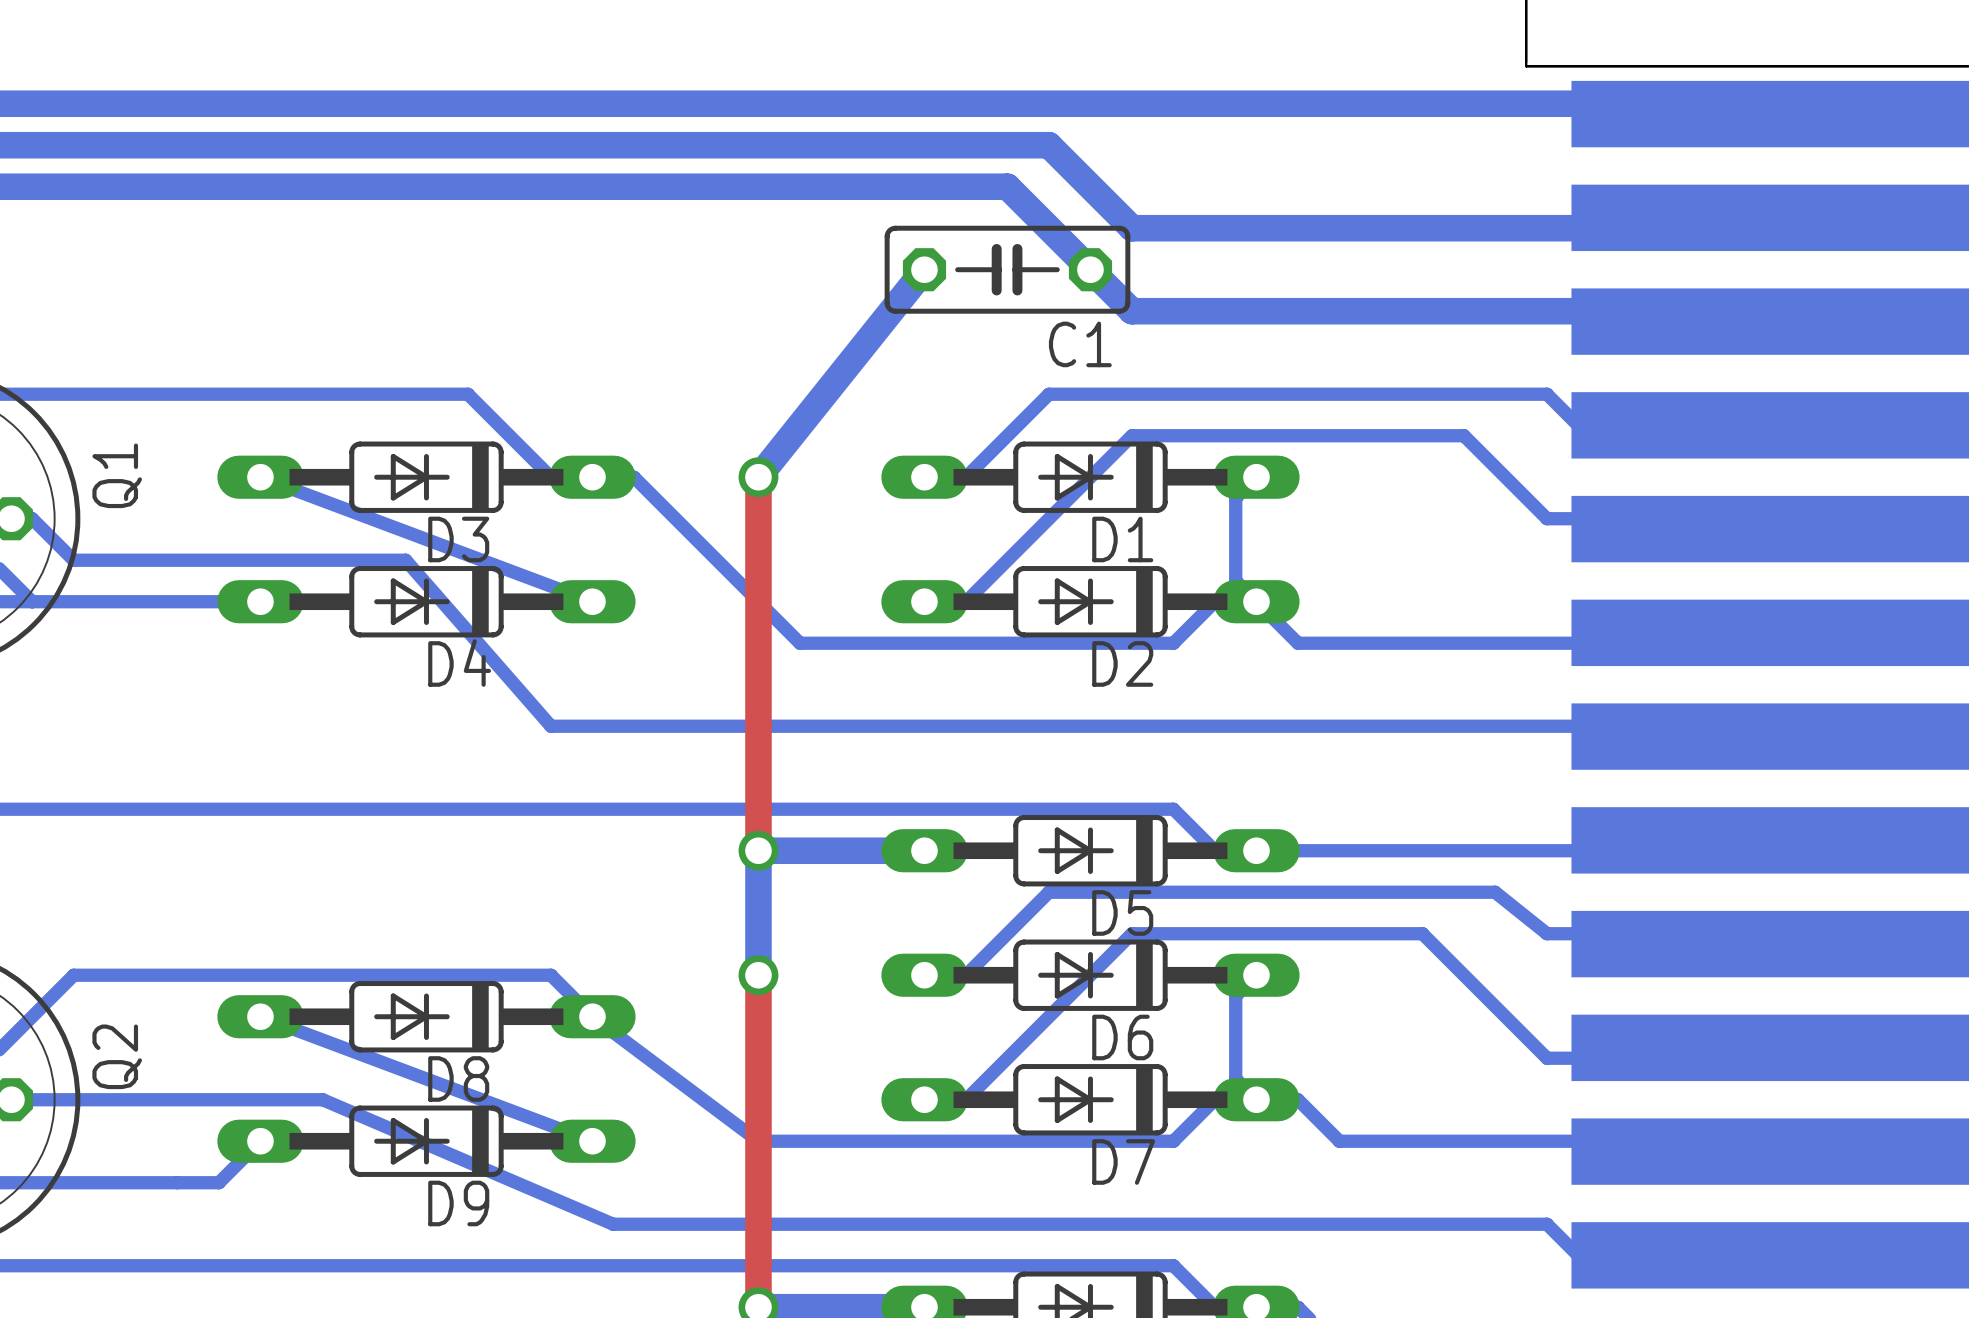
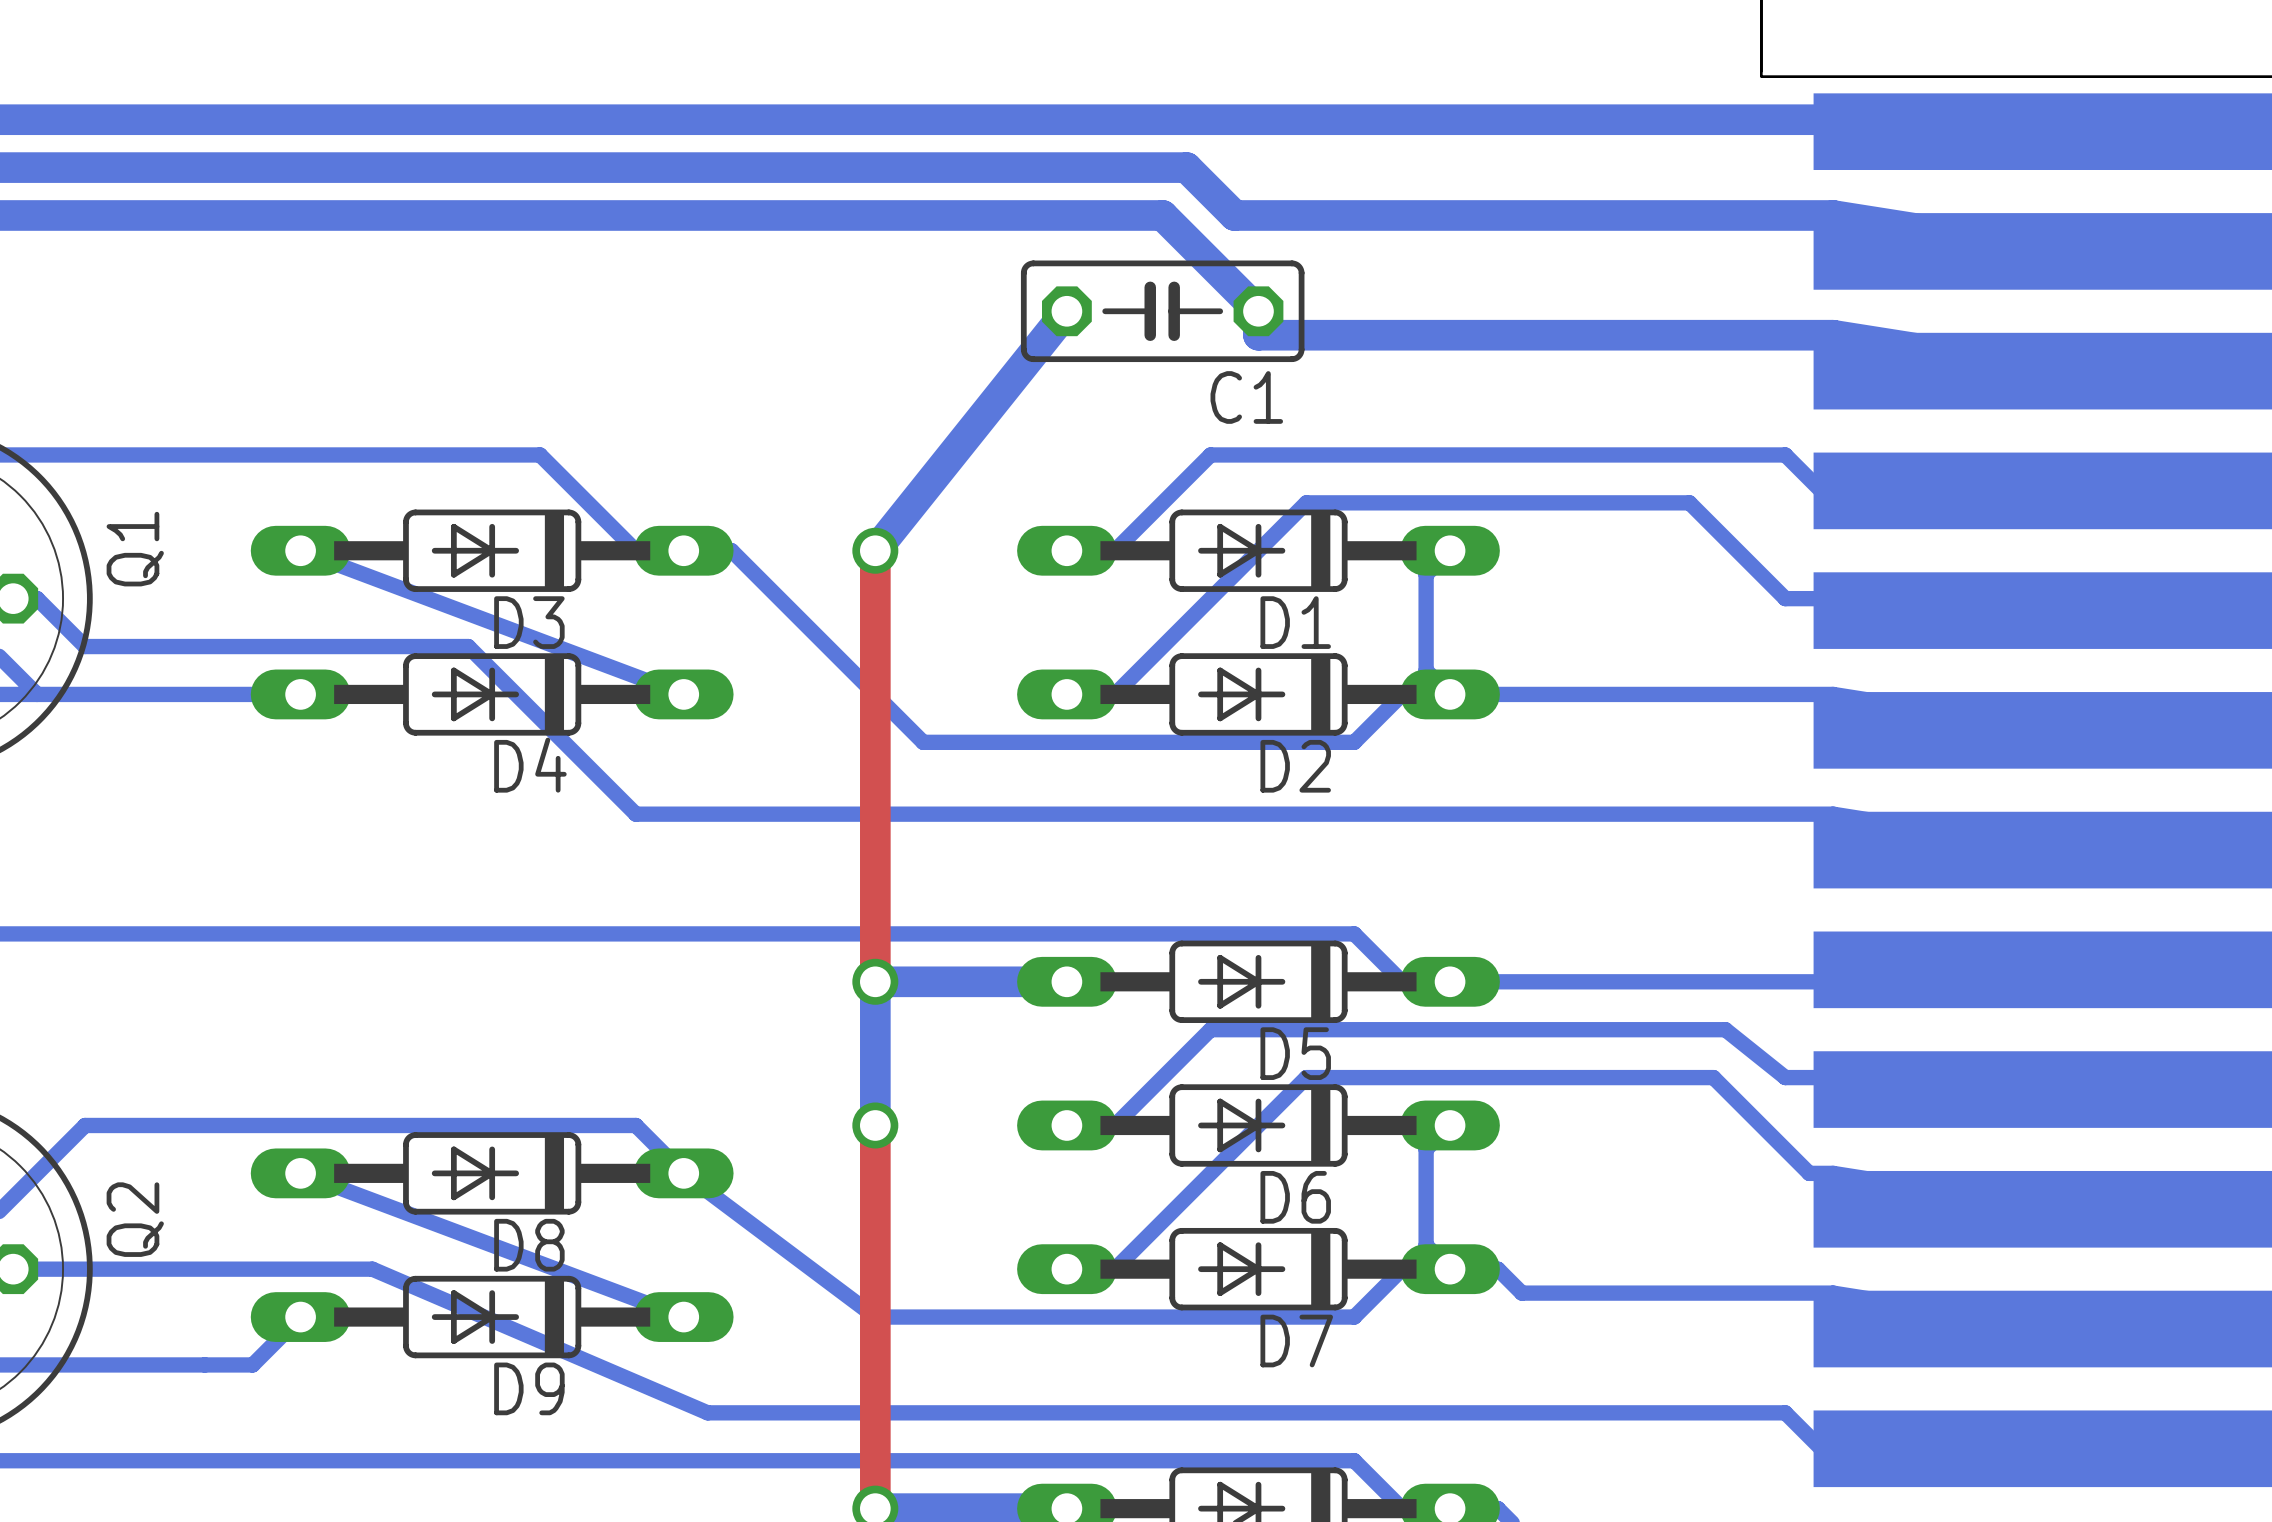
bottom track: (1028, 145) (1048, 145) (1131, 228) (1650, 228) (1785, 217) -> (1186, 167) (1234, 215) (1833, 215) (2060, 251)
bottom track: (1090, 269) (1131, 311) (1629, 311) (1785, 321) -> (1258, 311) (1258, 335) (1833, 335) (2060, 371)
bottom track: (405, 560) (550, 726) (1588, 726) (1785, 736) -> (468, 646) (635, 814) (1833, 814) (2060, 850)
bottom track: (1256, 601) (1297, 643) (1588, 643) (1785, 632) -> (1450, 694) (1833, 694) (2060, 730)
bottom track: (1422, 933) (1546, 1058) (1629, 1058) (1785, 1047) -> (1641, 1077) (1713, 1077) (1809, 1173) (1833, 1173) (2060, 1209)
bottom track: (1318, 1120) (1339, 1141) (1609, 1141) (1785, 1151) -> (1521, 1293) (1833, 1293) (2060, 1329)

